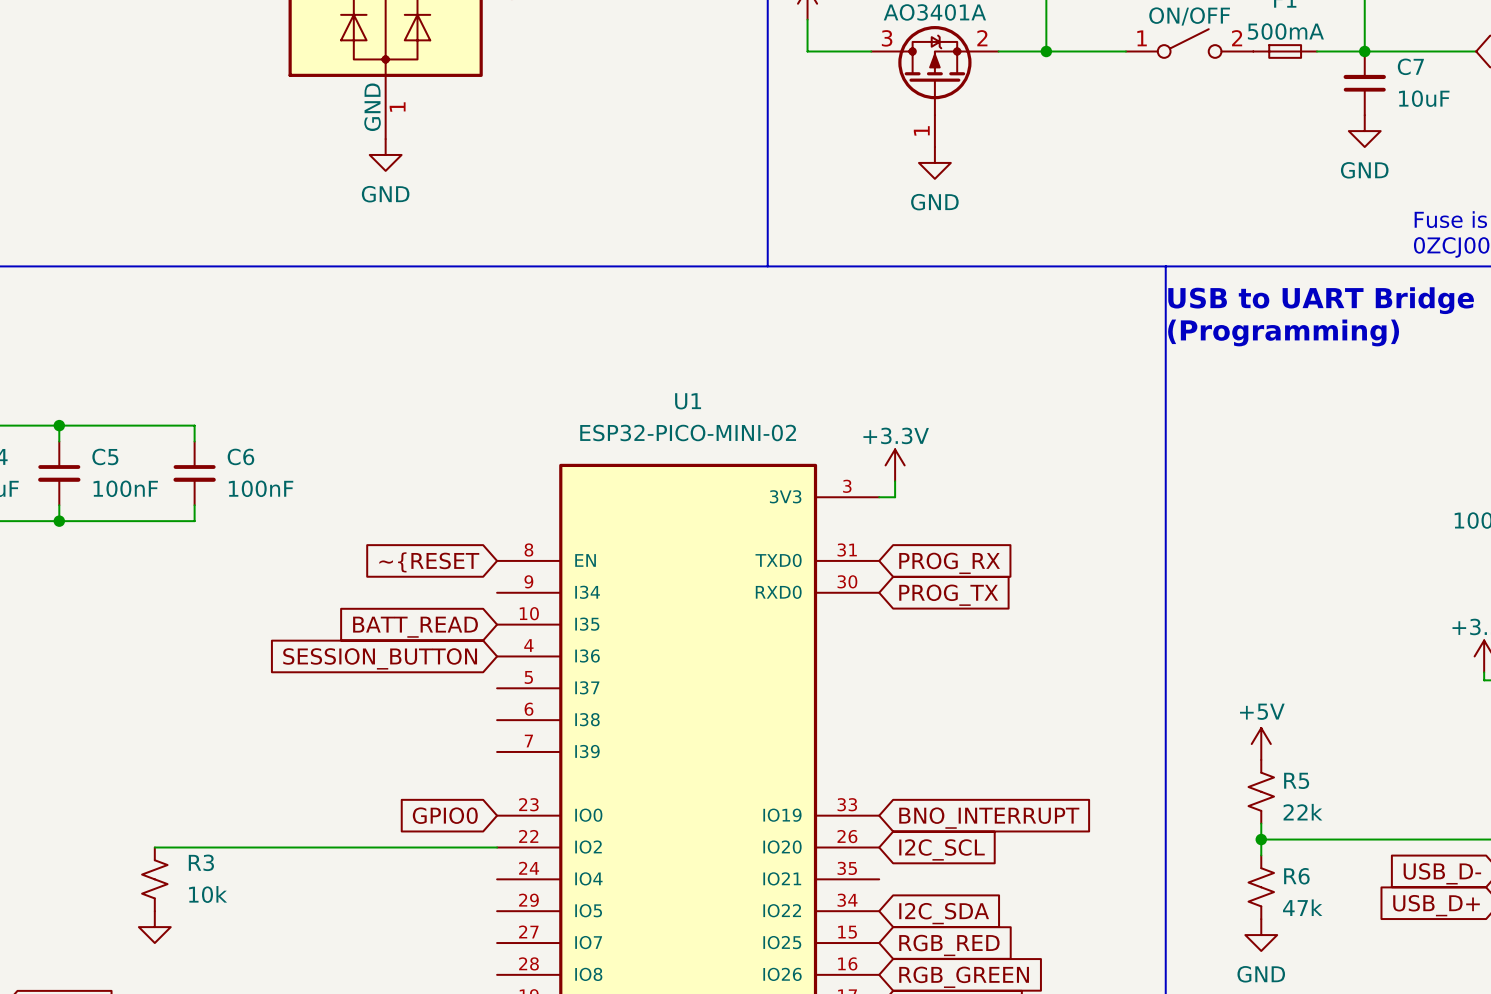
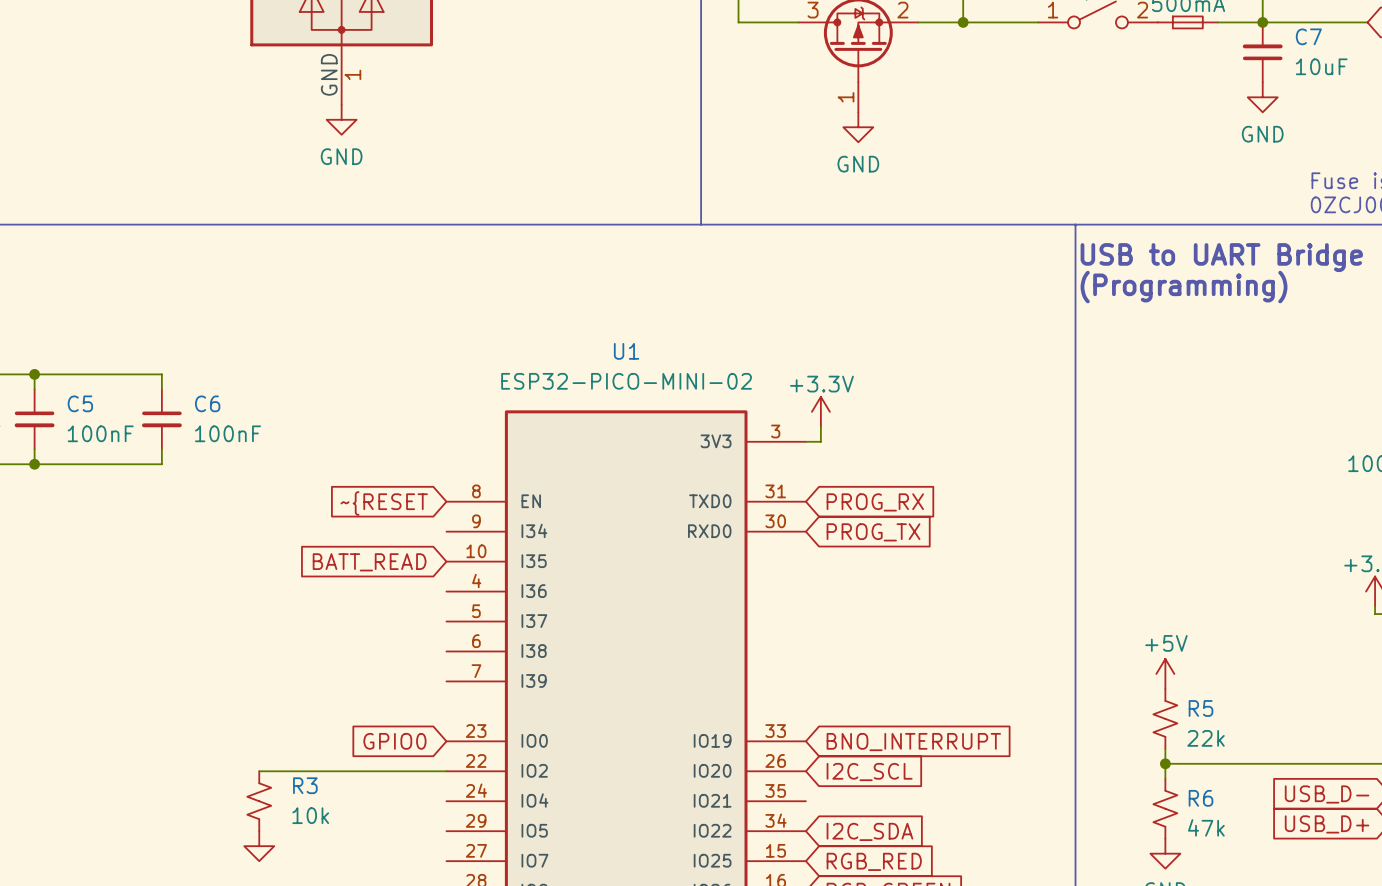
global label: SESSION_BUTTON (380, 658) -> none
wire: (154, 847) (298, 847) -> none
R3 position: (154, 879) -> (259, 801)
power symbol position: (154, 927) -> (259, 846)

